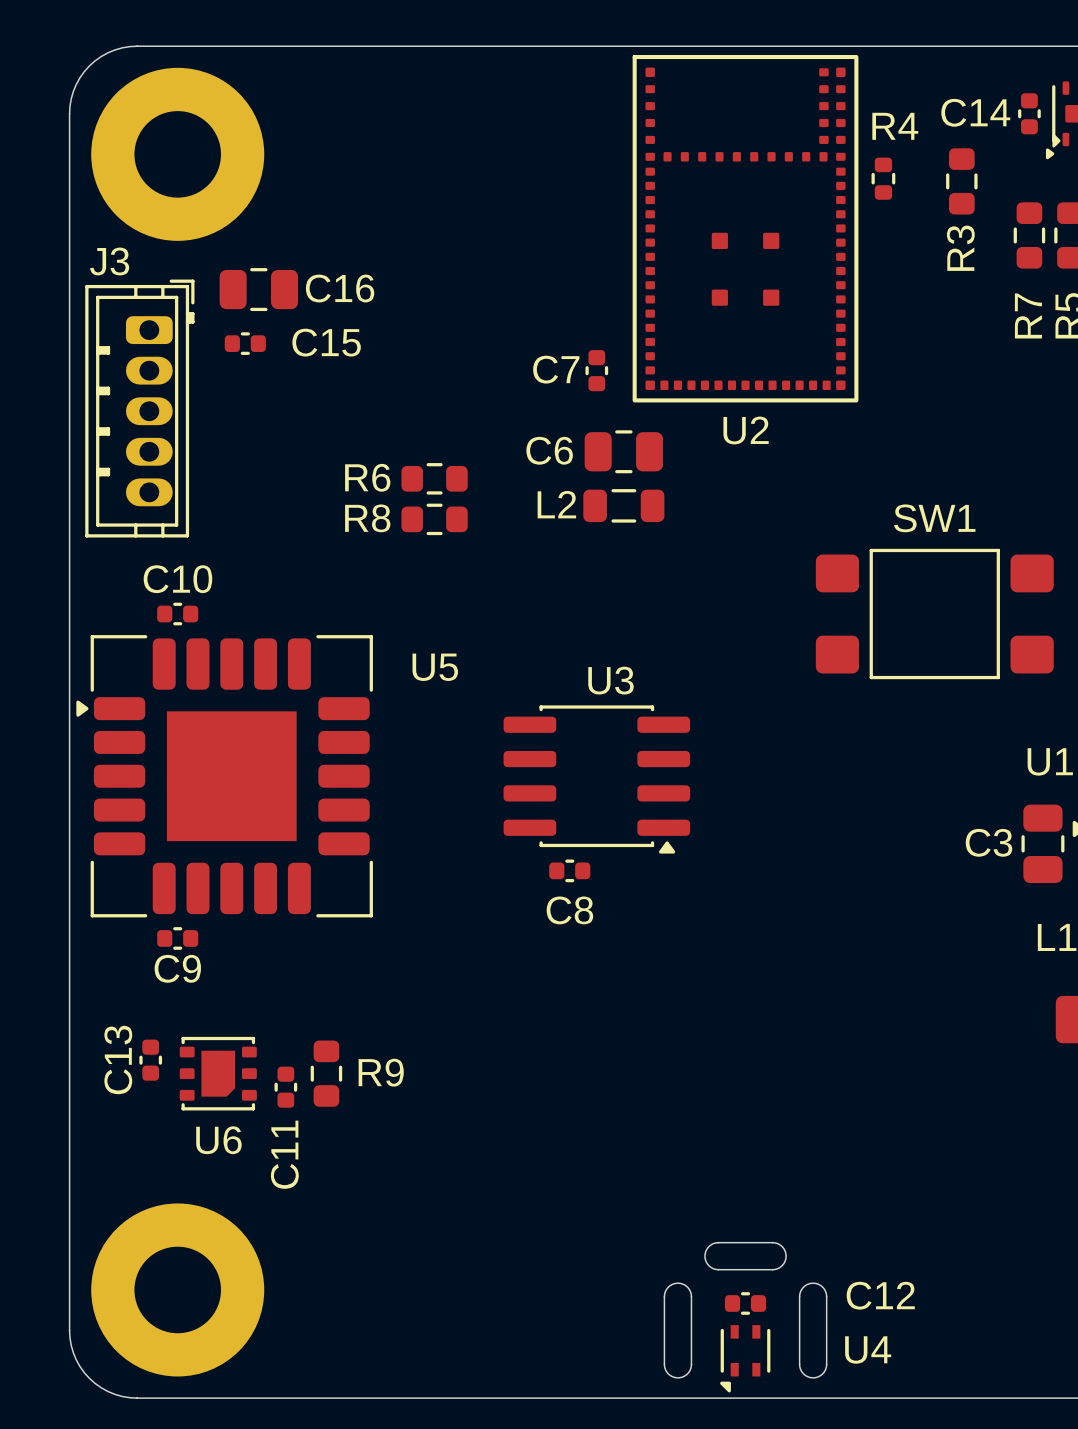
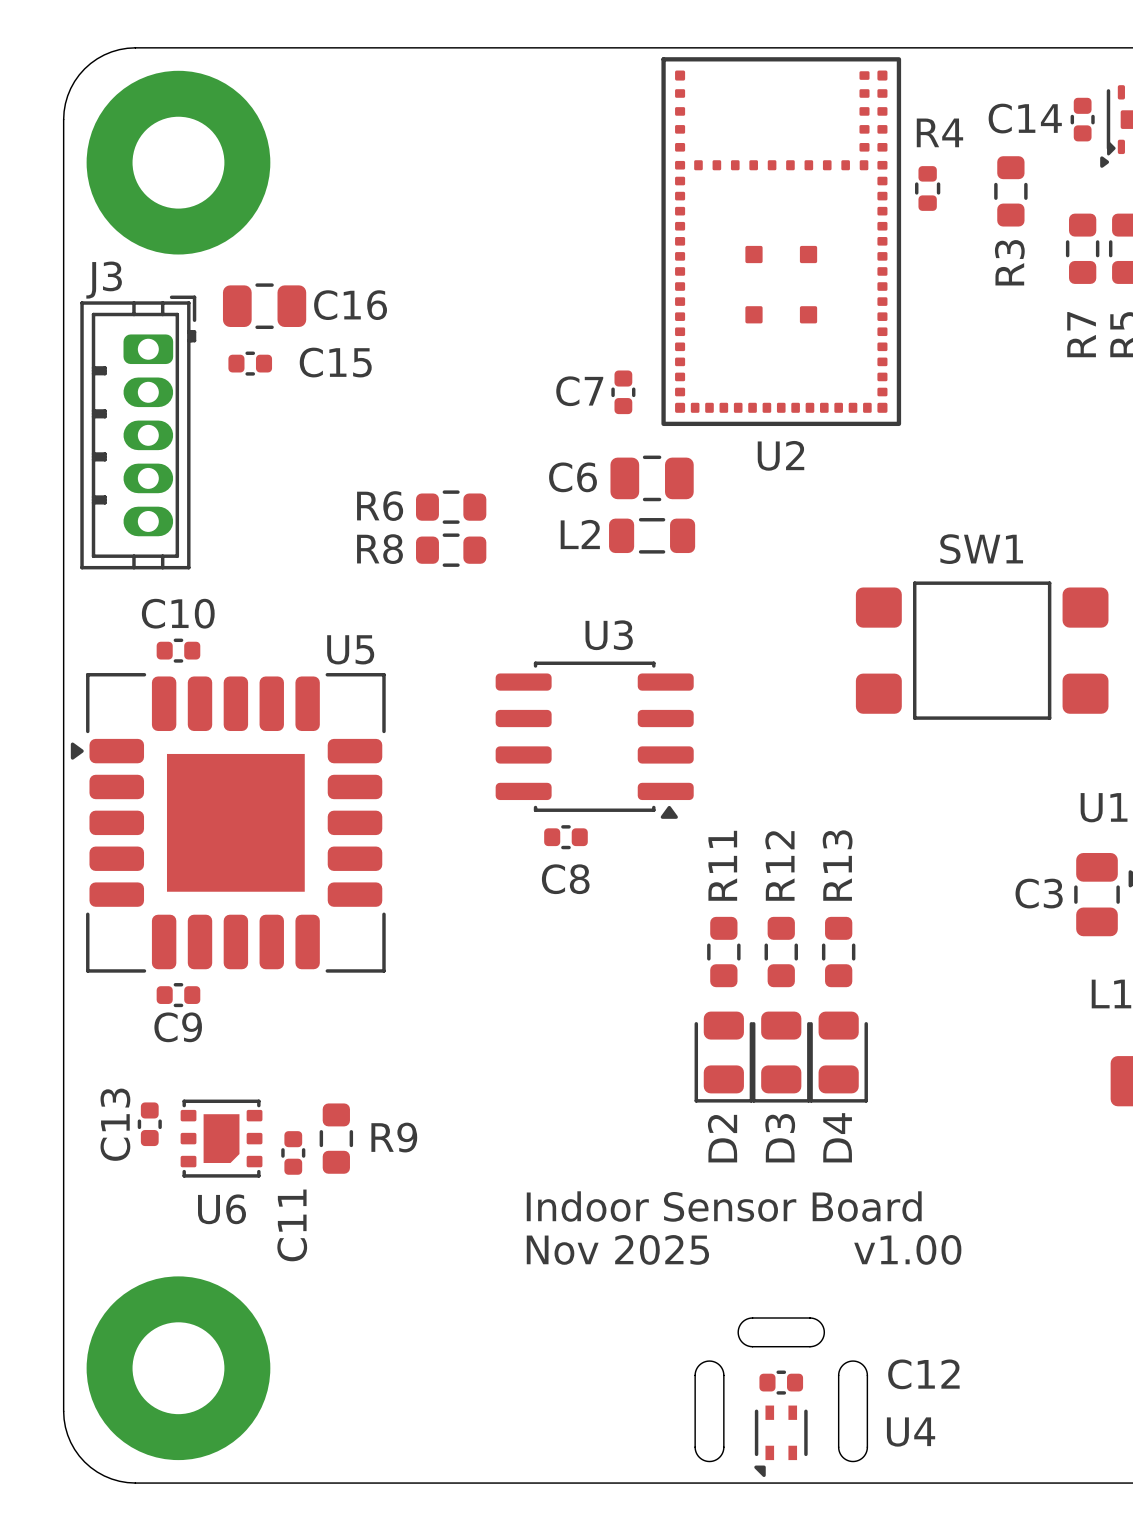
U5 name position: U5 (435, 667) -> U5 (350, 649)
U3 position: (596, 779) -> (594, 740)
C8 position: (569, 870) -> (565, 837)
R11: none -> (723, 952)
R12: none -> (781, 952)
R13: none -> (838, 952)
D2: none -> (723, 1057)
D3: none -> (781, 1057)
D4: none -> (838, 1057)
text: none -> Indoor Sensor Board (724, 1206)
text: none -> Nov 2025 (617, 1249)
text: none -> v1.00 (907, 1249)

